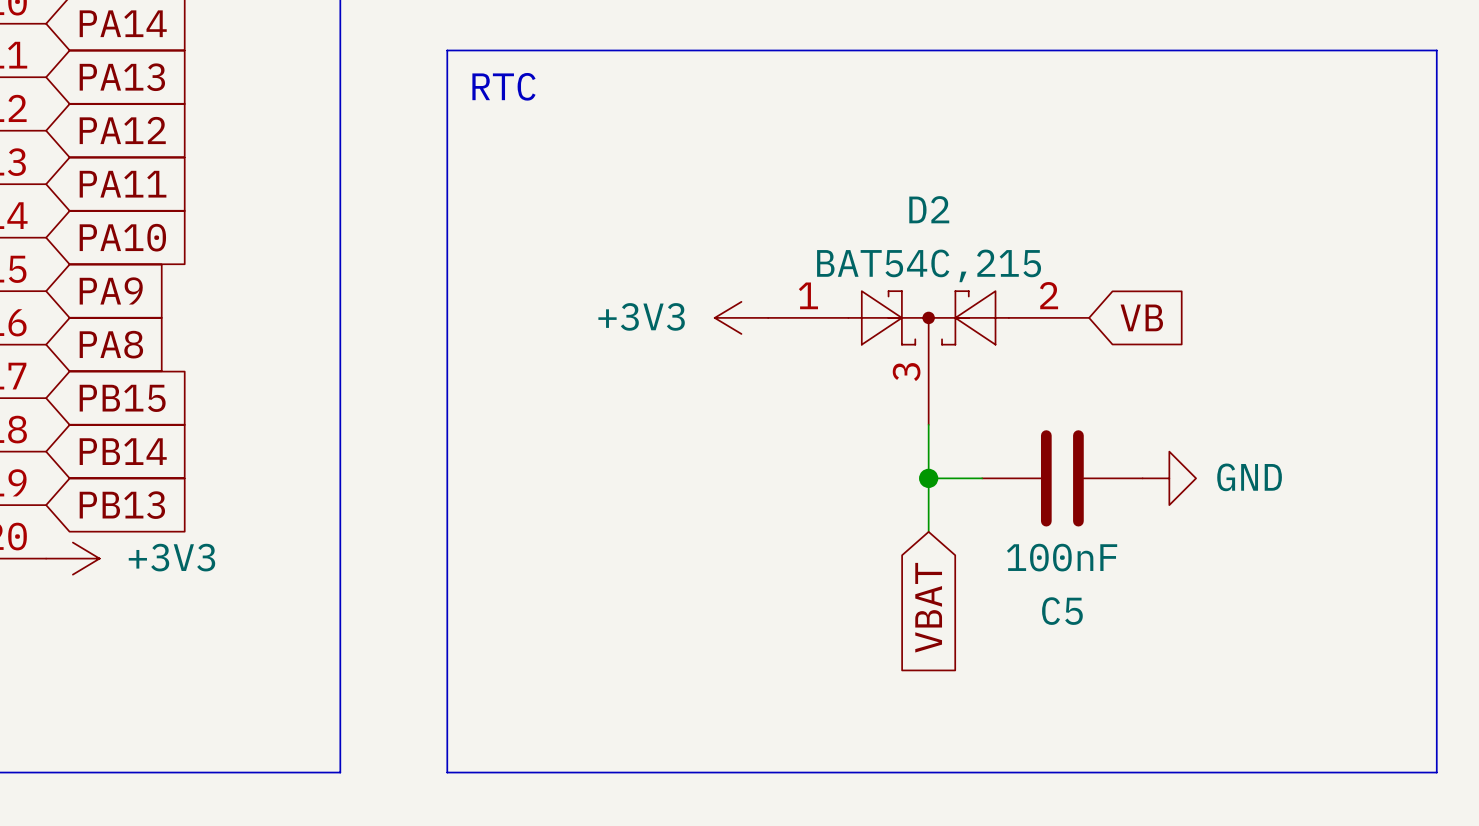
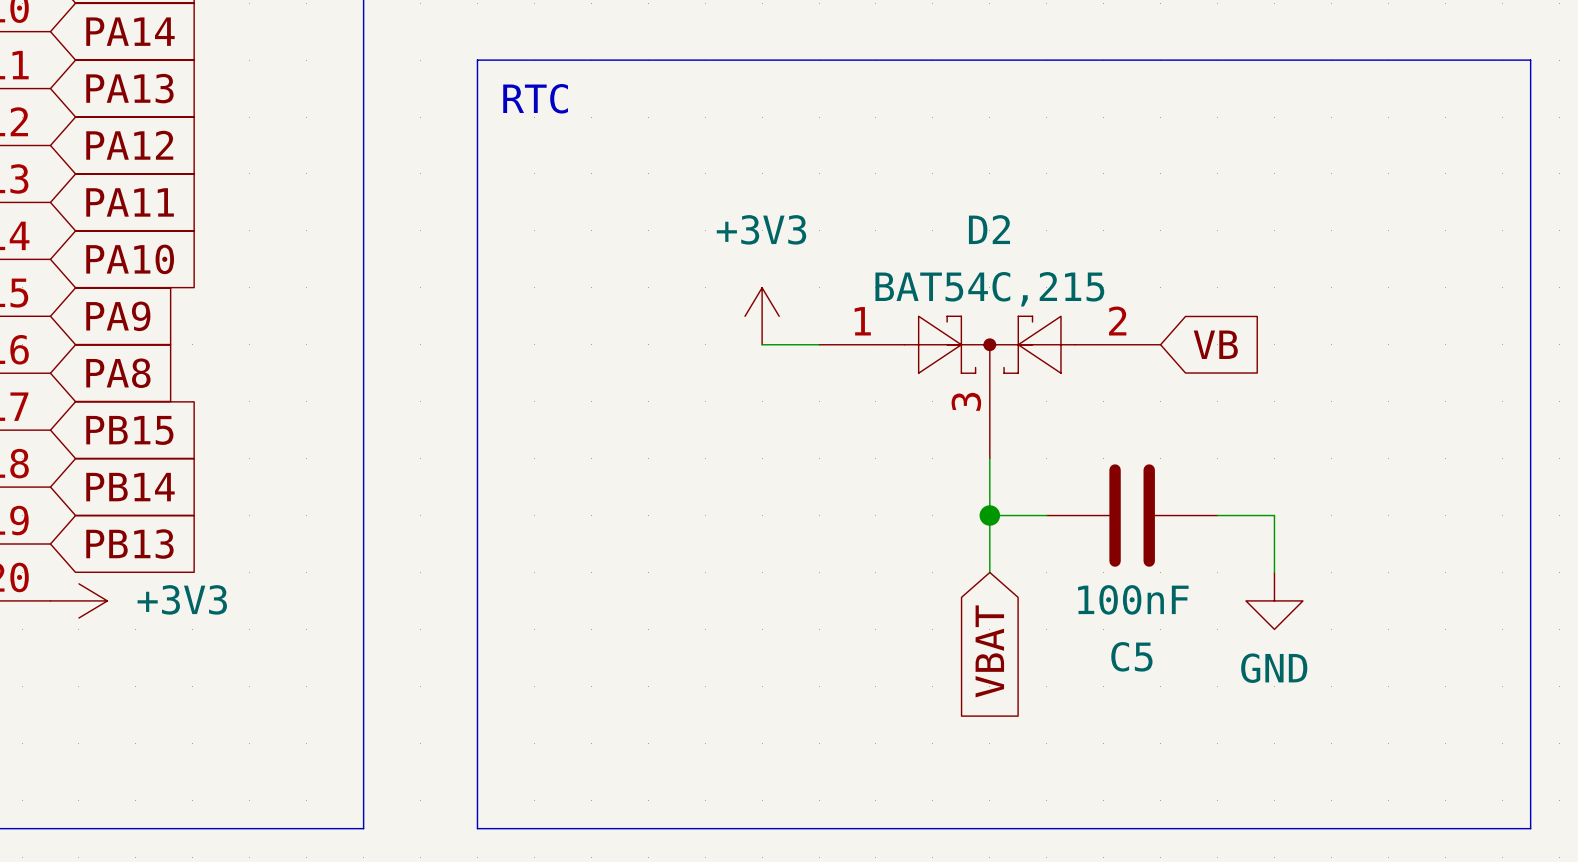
power symbol rotation: 0° (741, 317) -> 90° clockwise (762, 316)
power symbol position: +3V3 (741, 317) -> +3V3 (762, 316)
wire: none -> (1217, 515) (1274, 515) (1274, 572)
power symbol rotation: 0° (1169, 478) -> 90° clockwise (1274, 600)
power symbol position: GND (1169, 478) -> GND (1274, 600)

